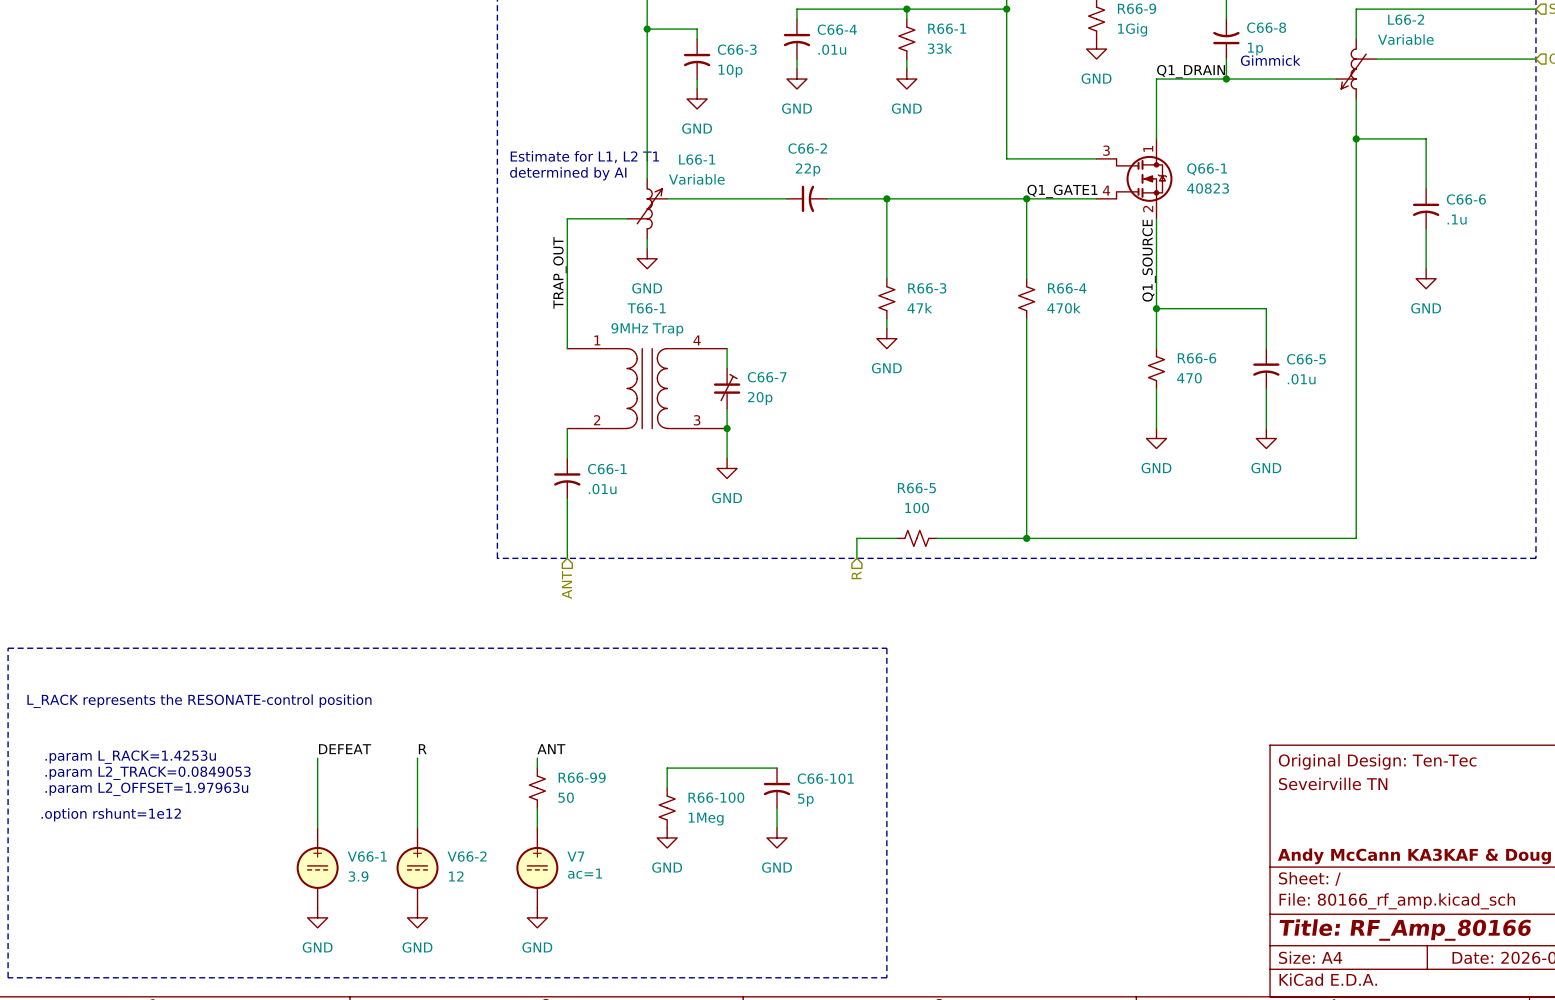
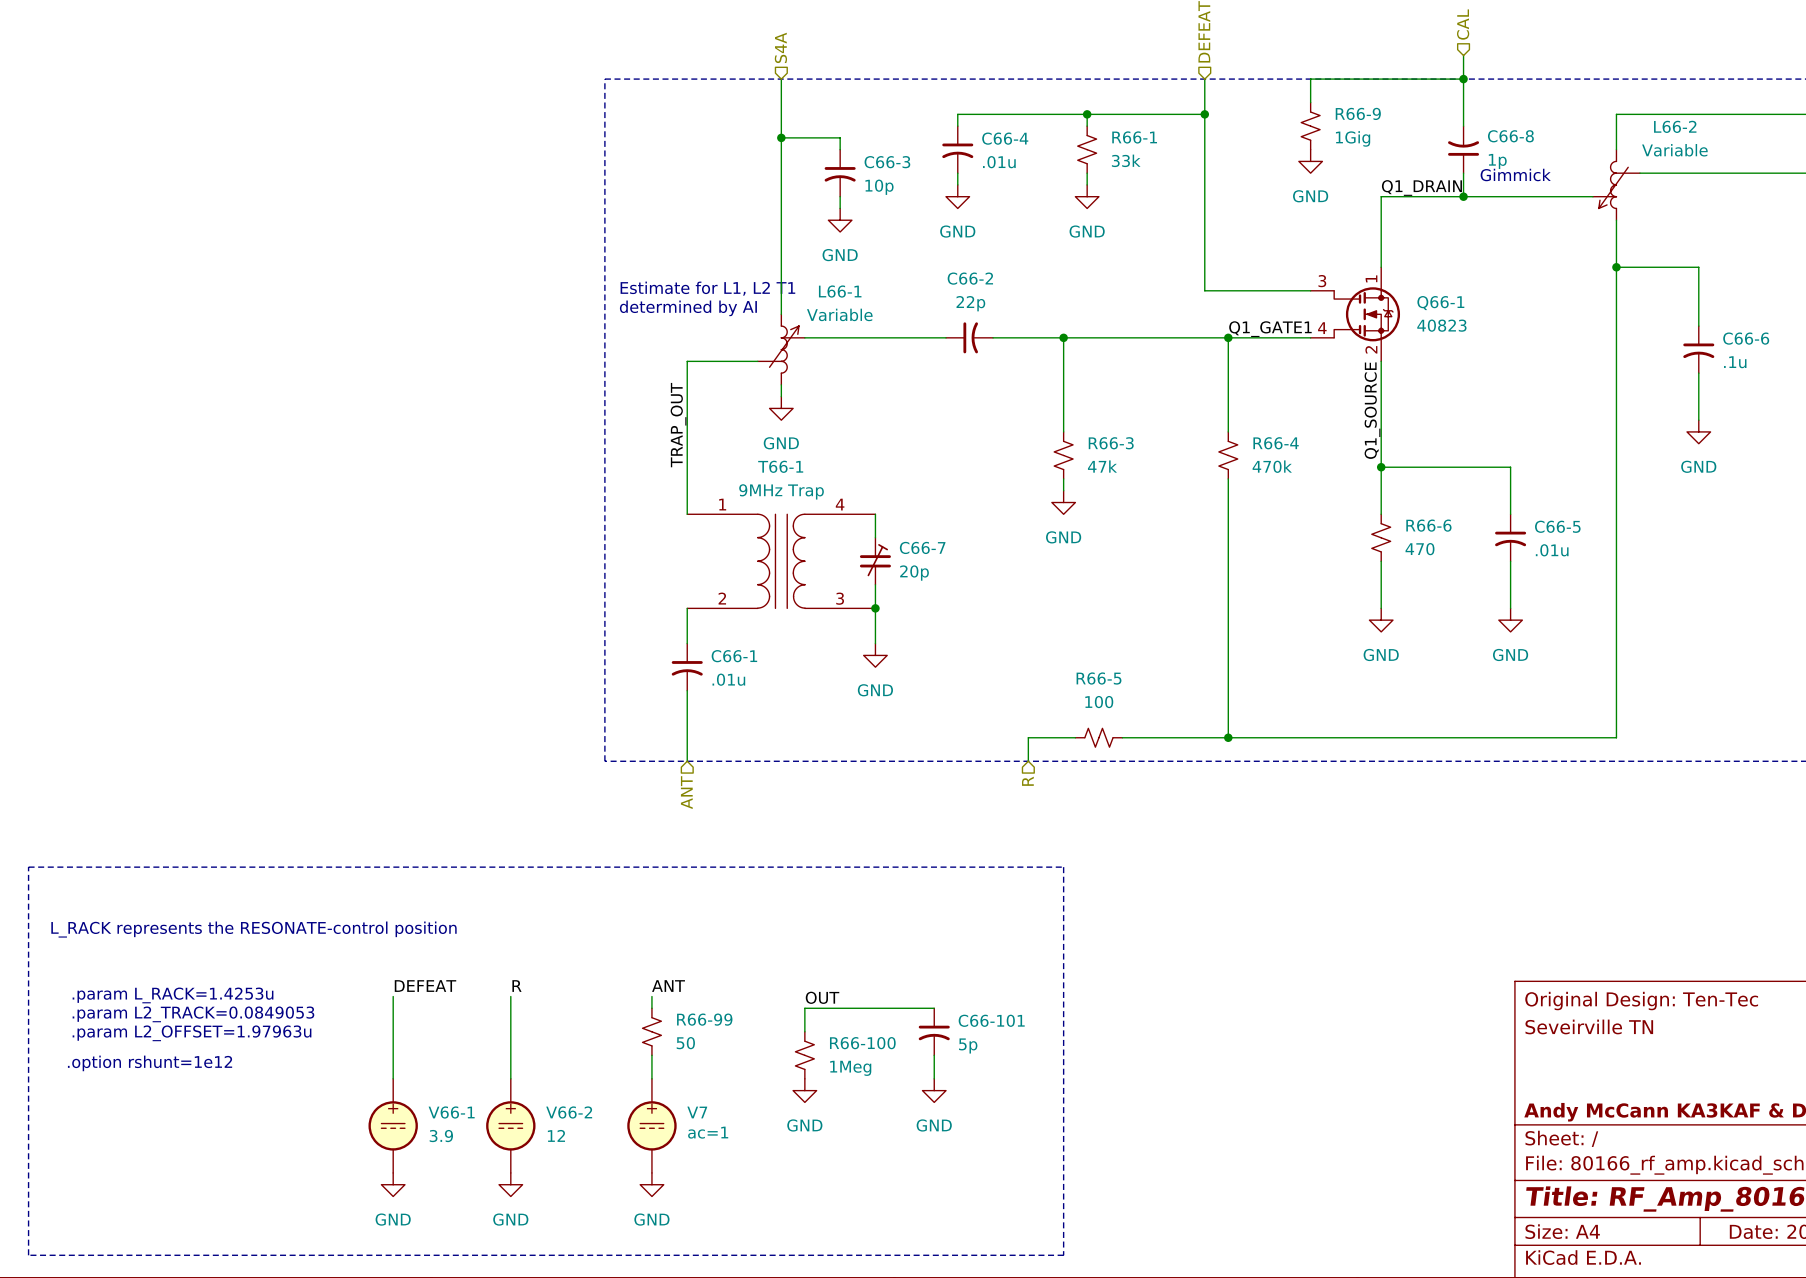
label: none -> OUT (822, 997)

